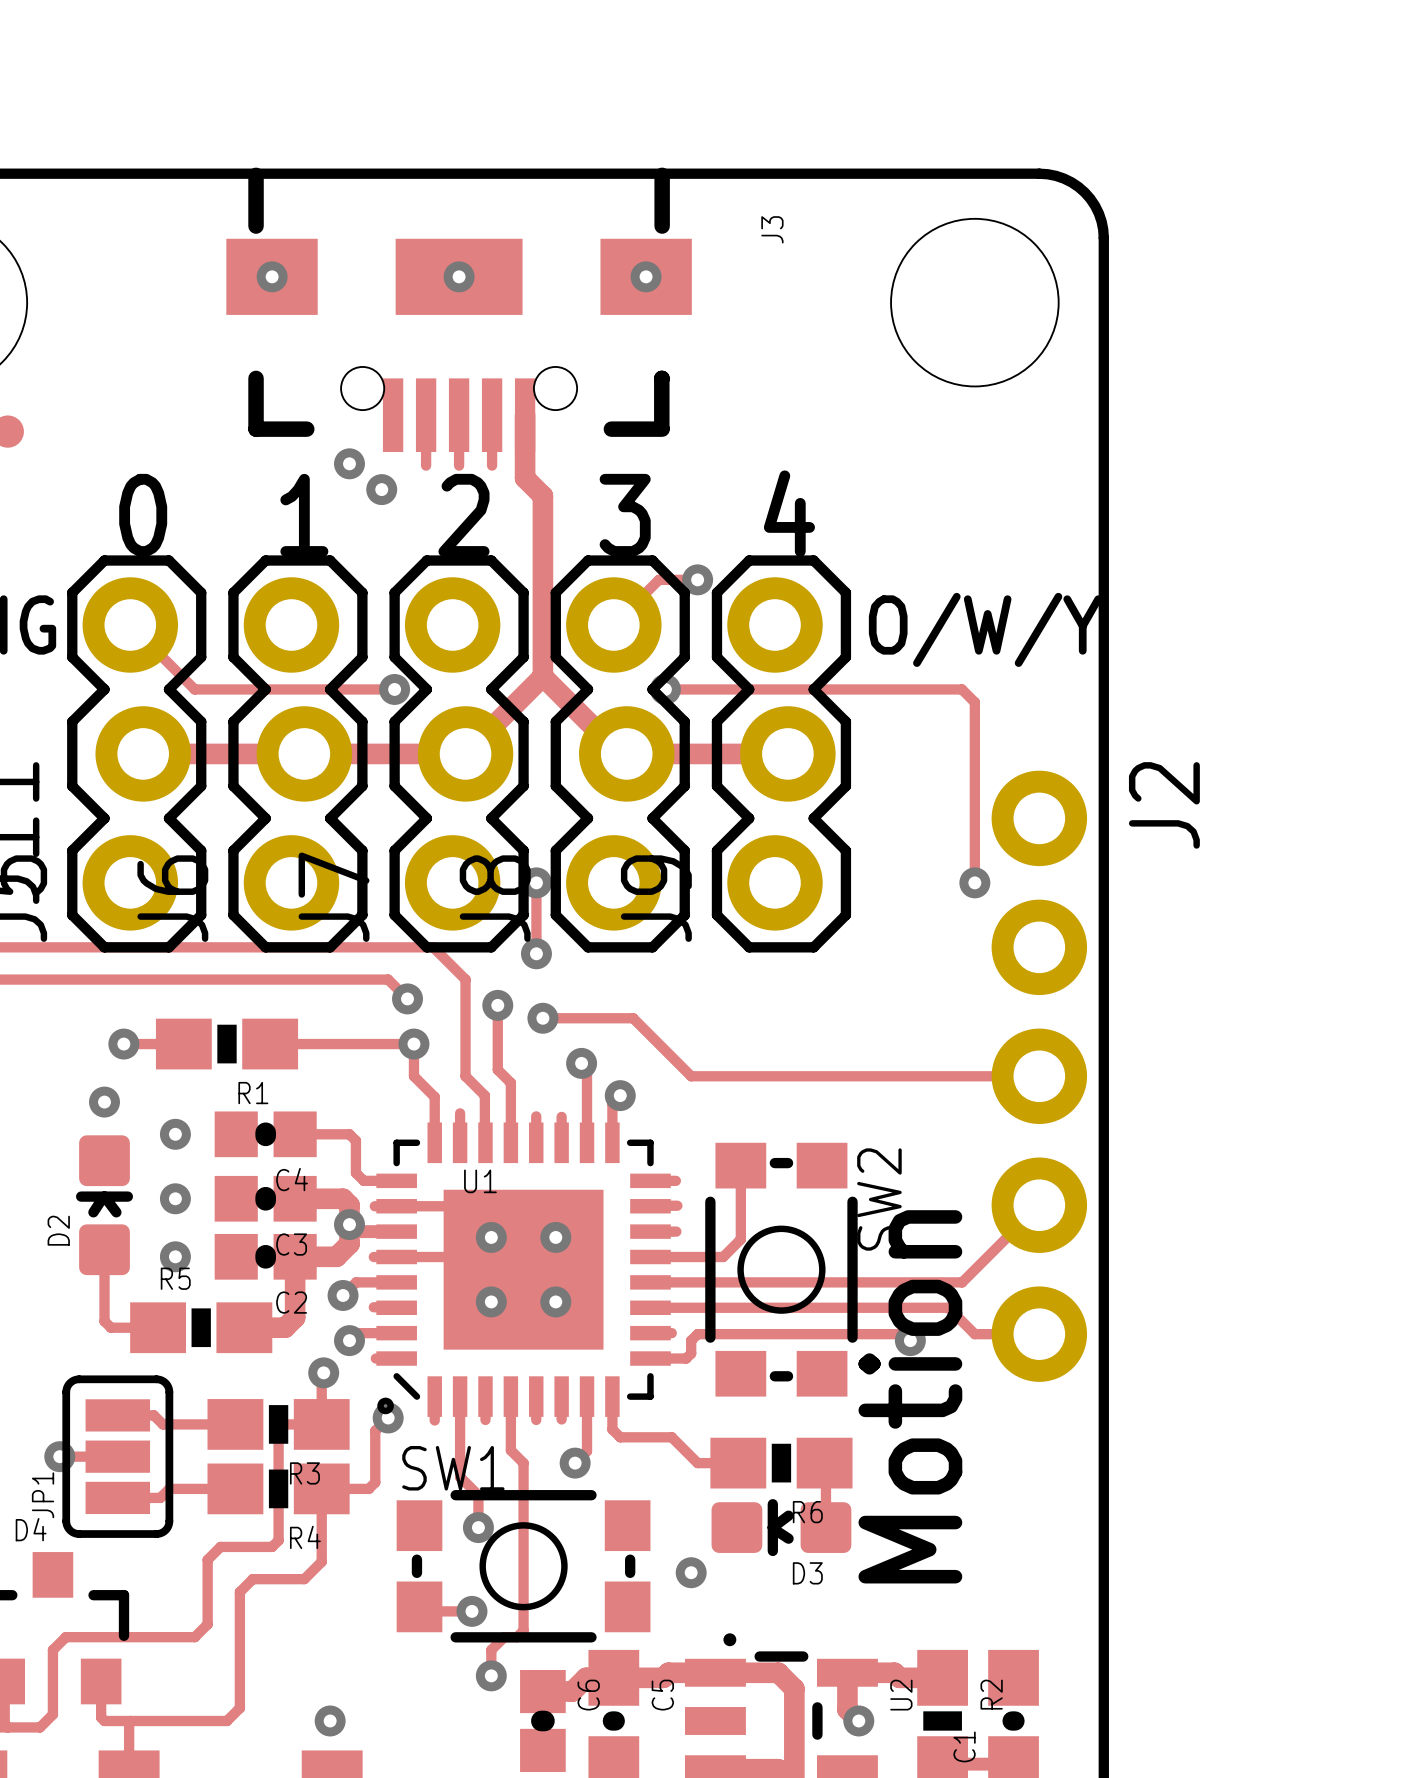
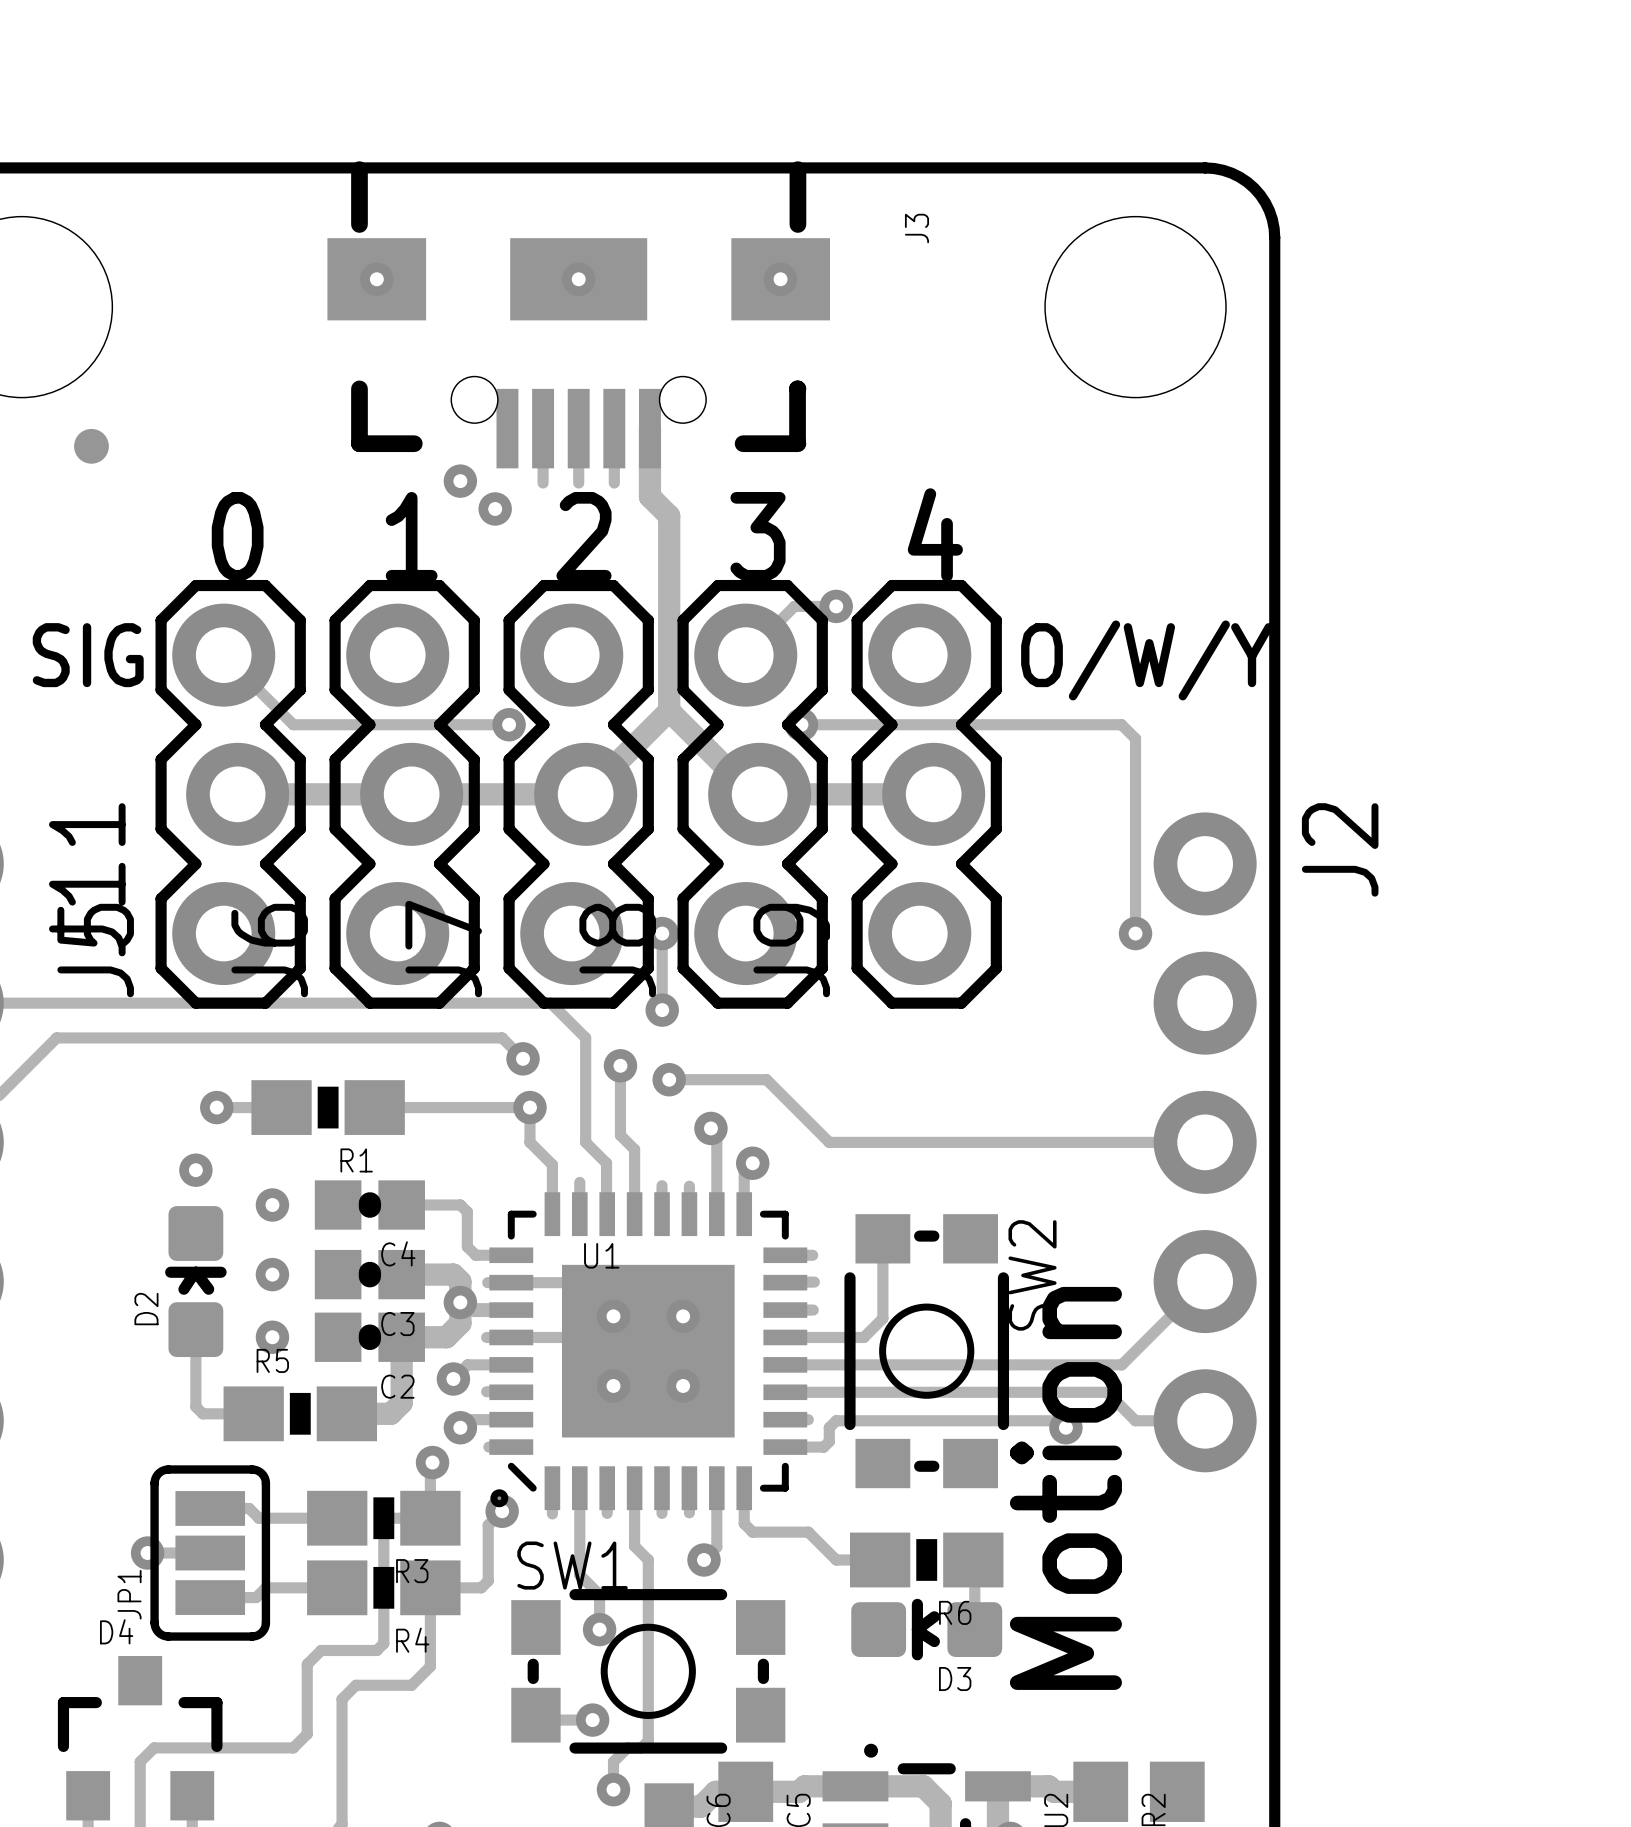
via: (691, 1572) -> none

